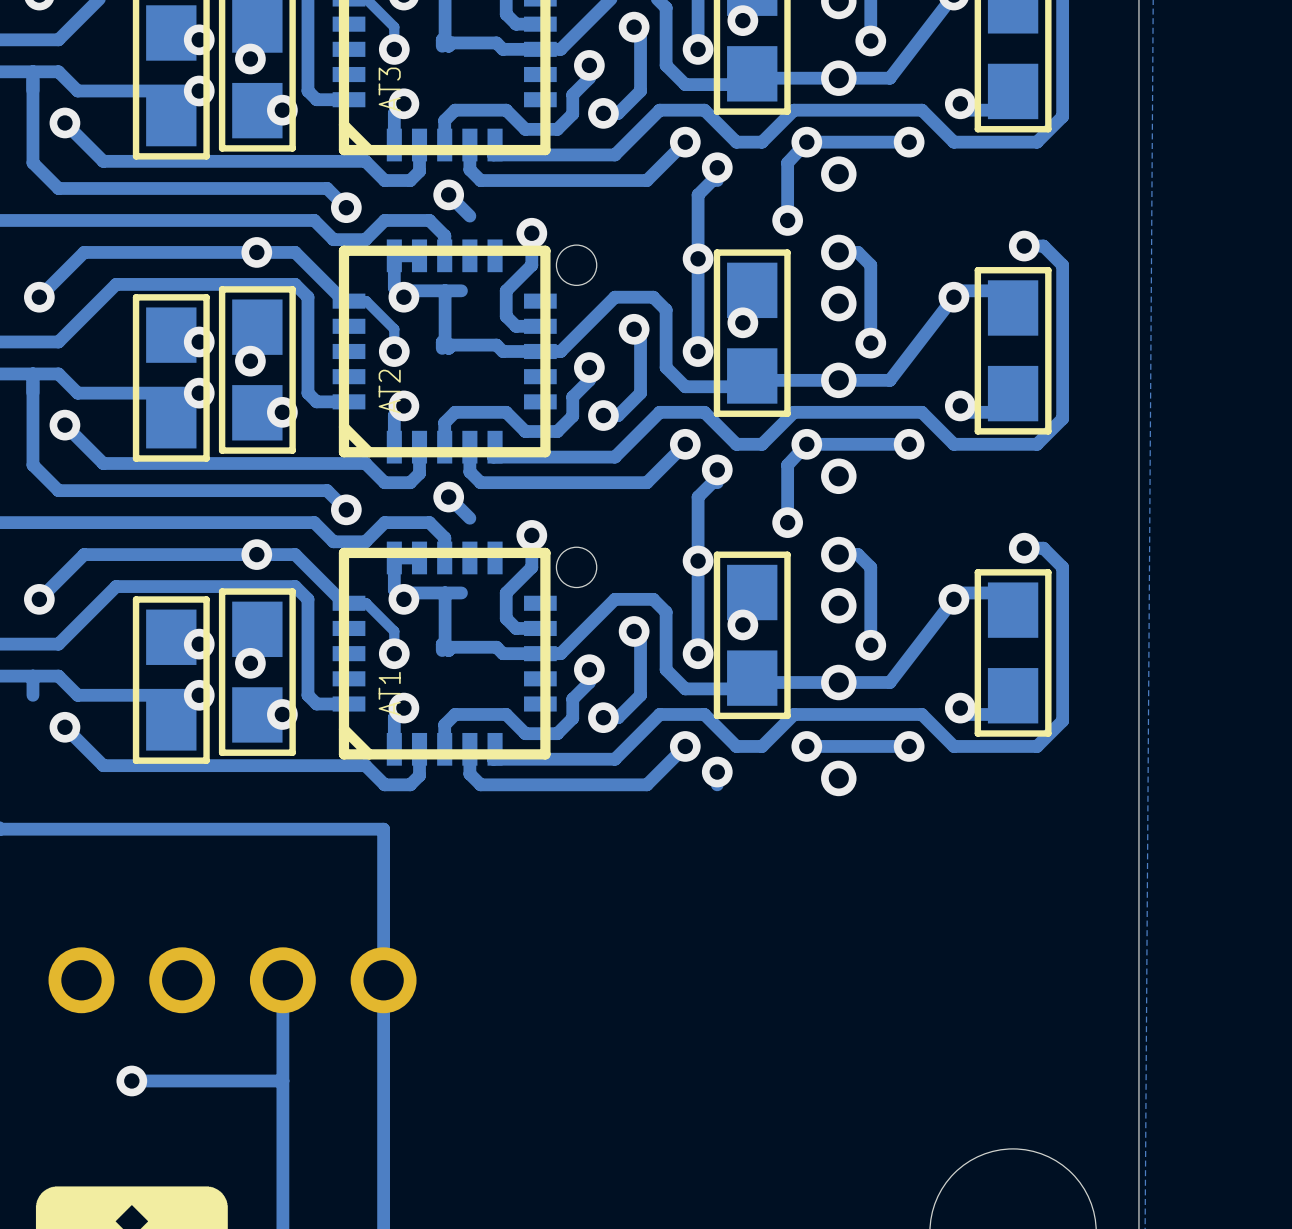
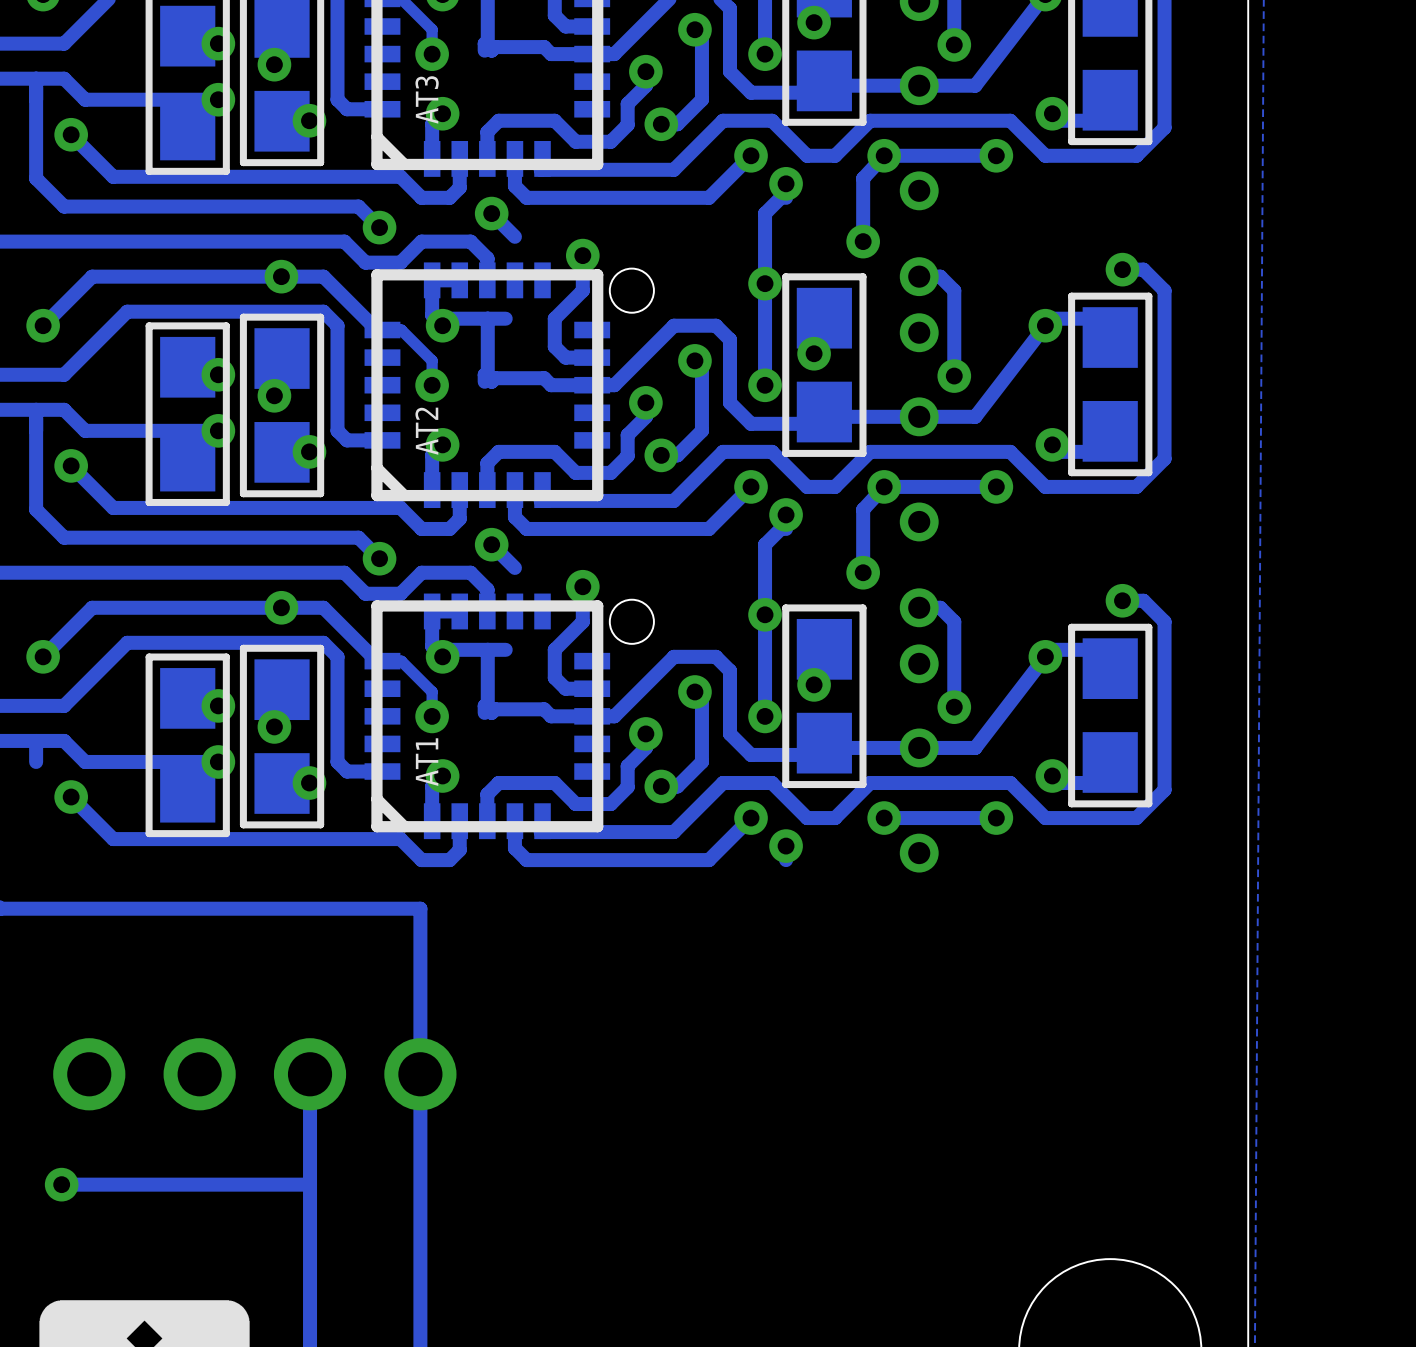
track: none -> (144, 1184) (61, 1184)
via position: (131, 1080) -> (61, 1184)

